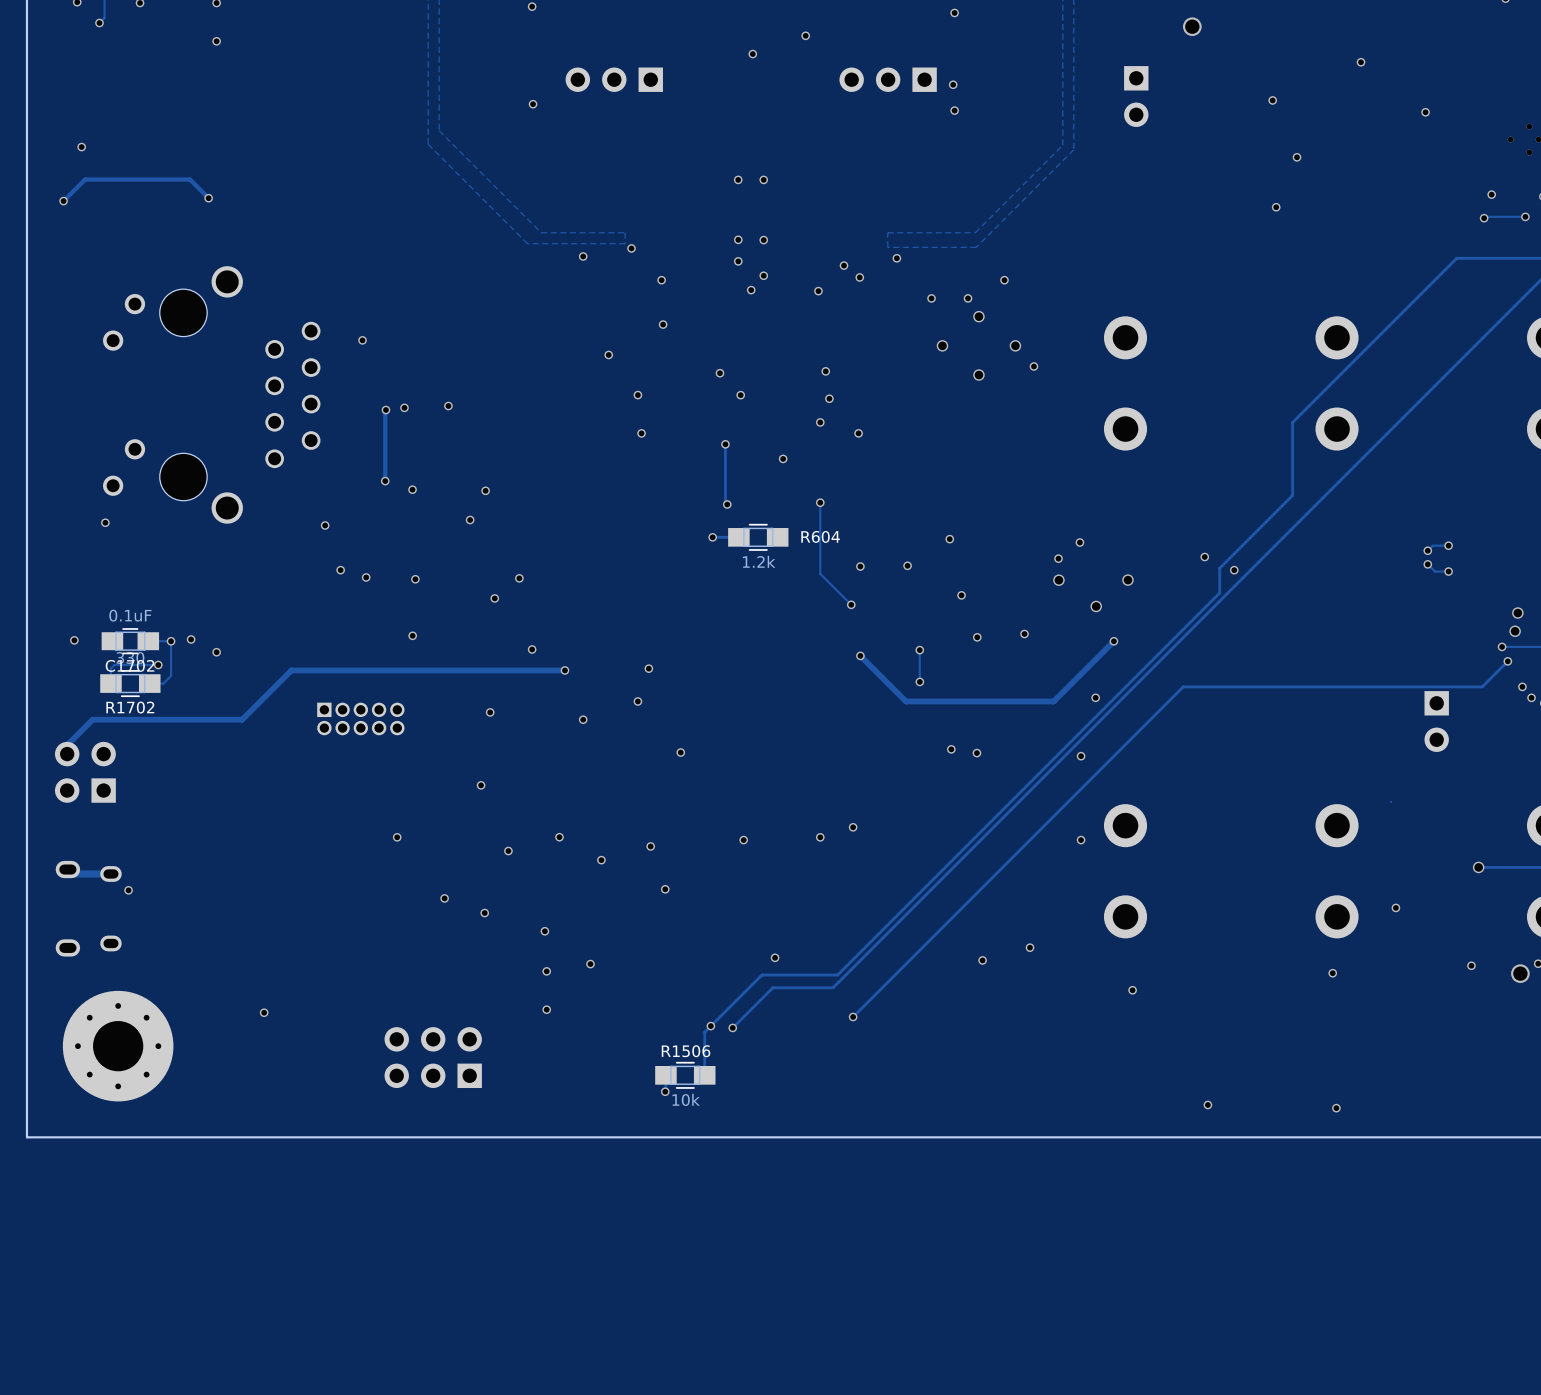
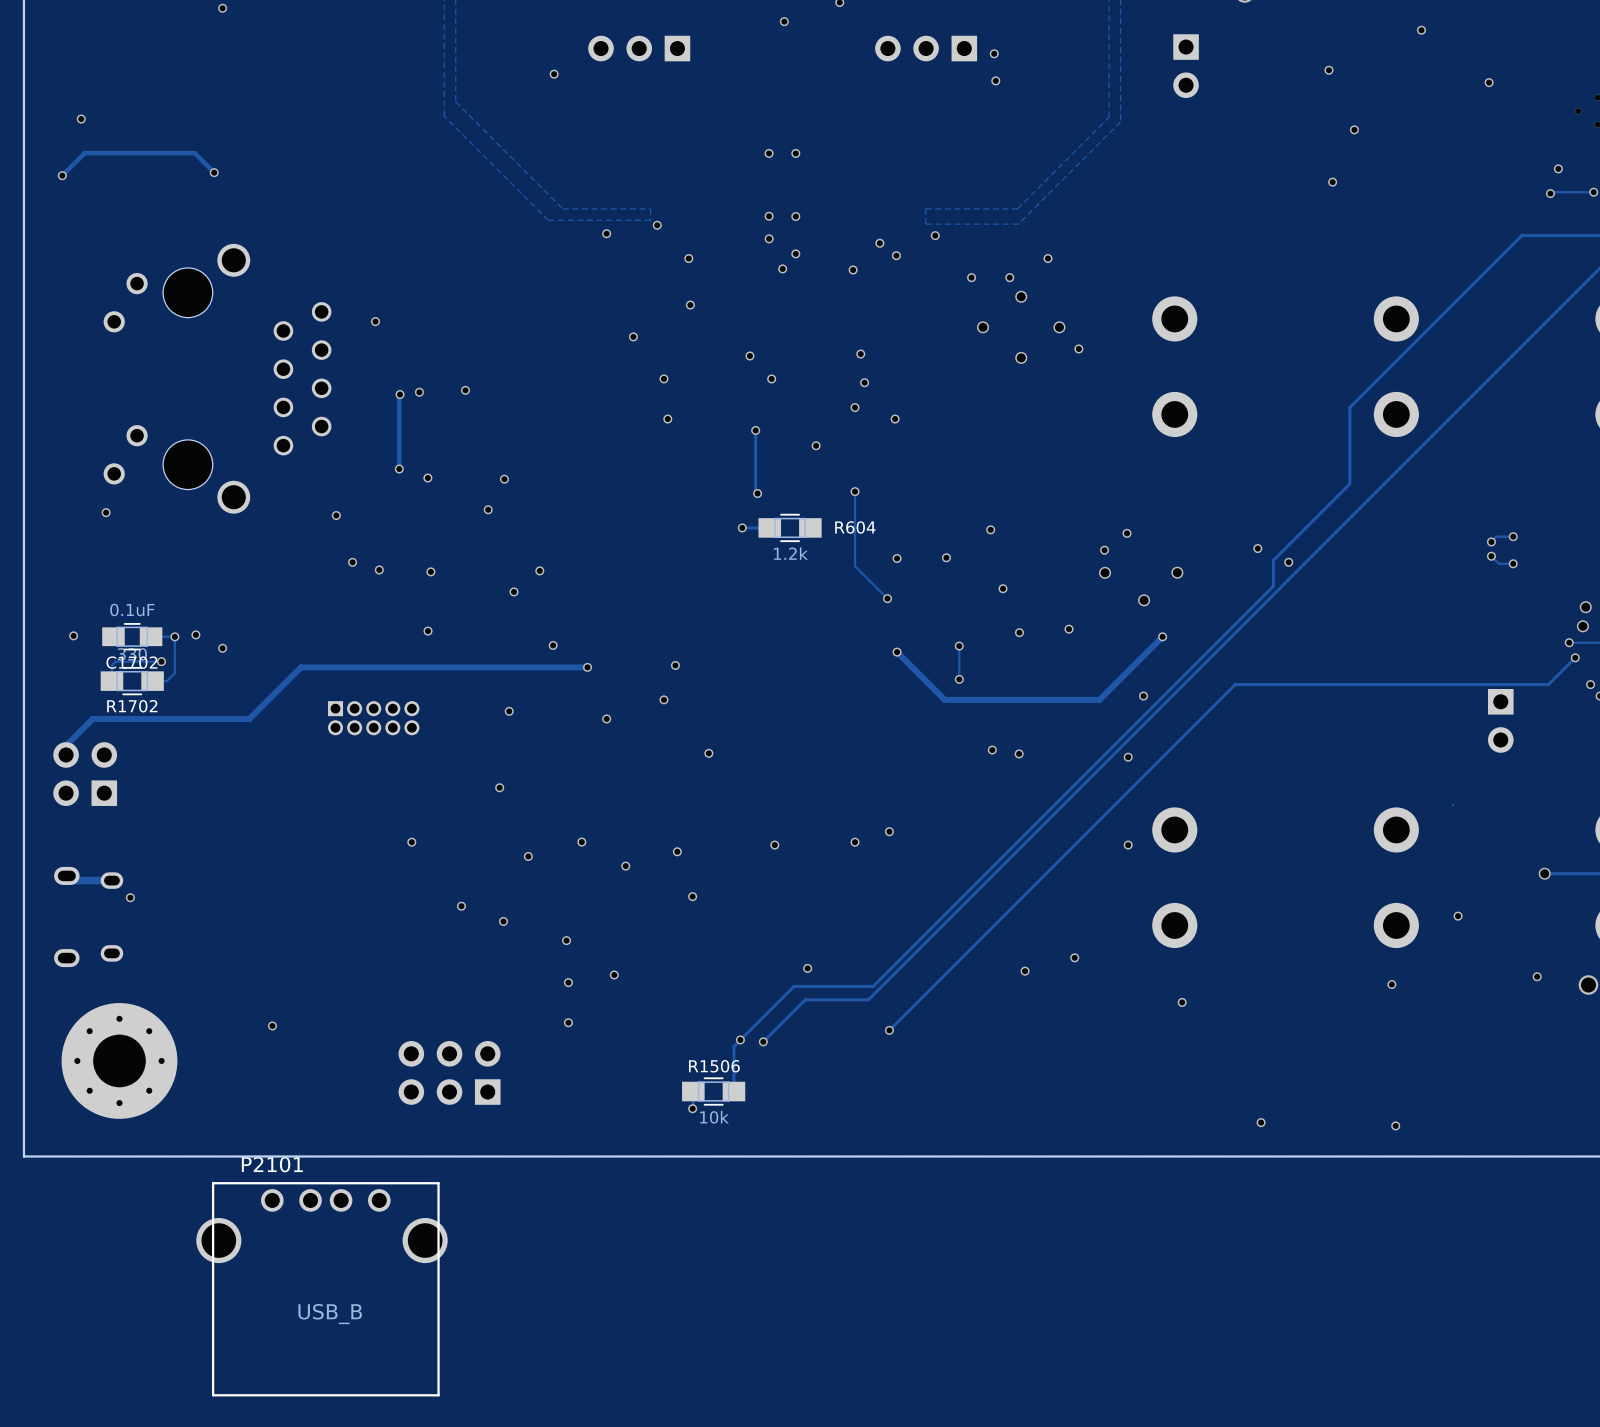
P2101: none -> USB_B (321, 1289)

